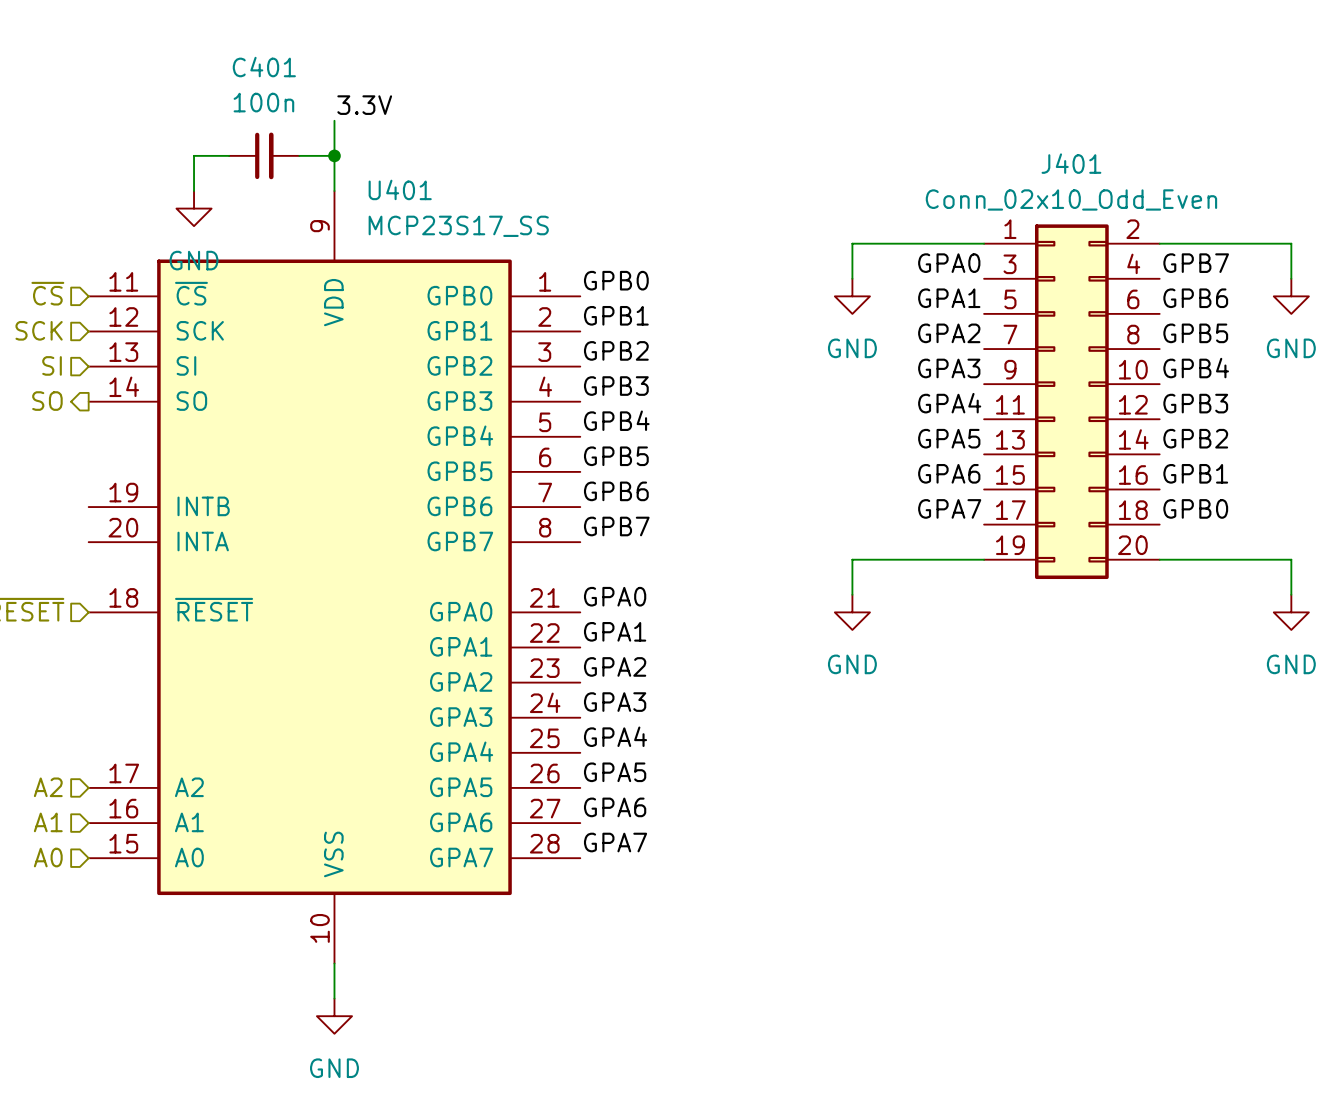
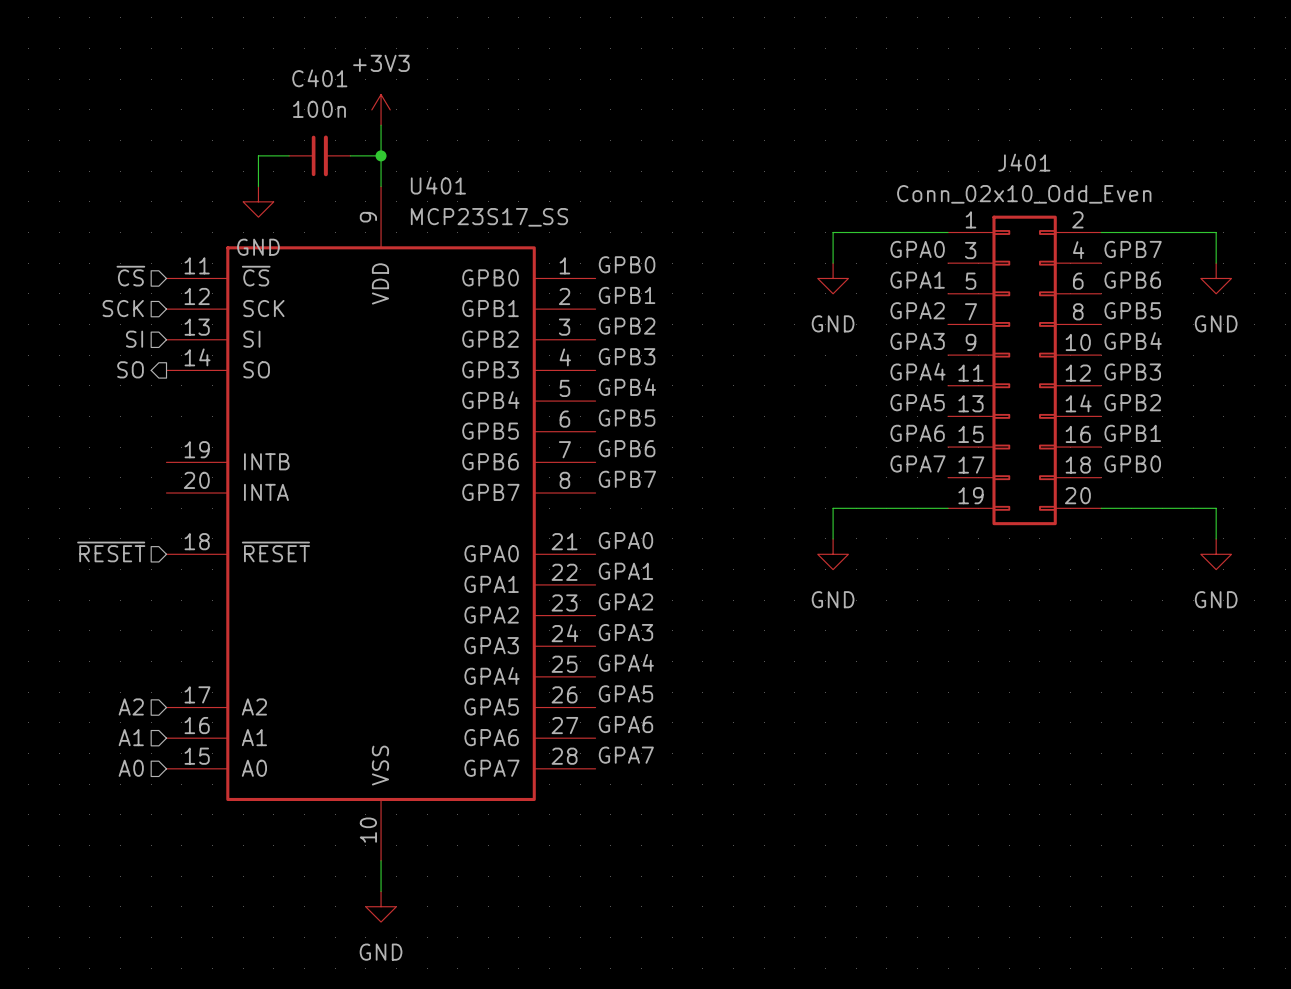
power symbol: none -> +3V3 (381, 109)
label: 3.3V (364, 105) -> none

